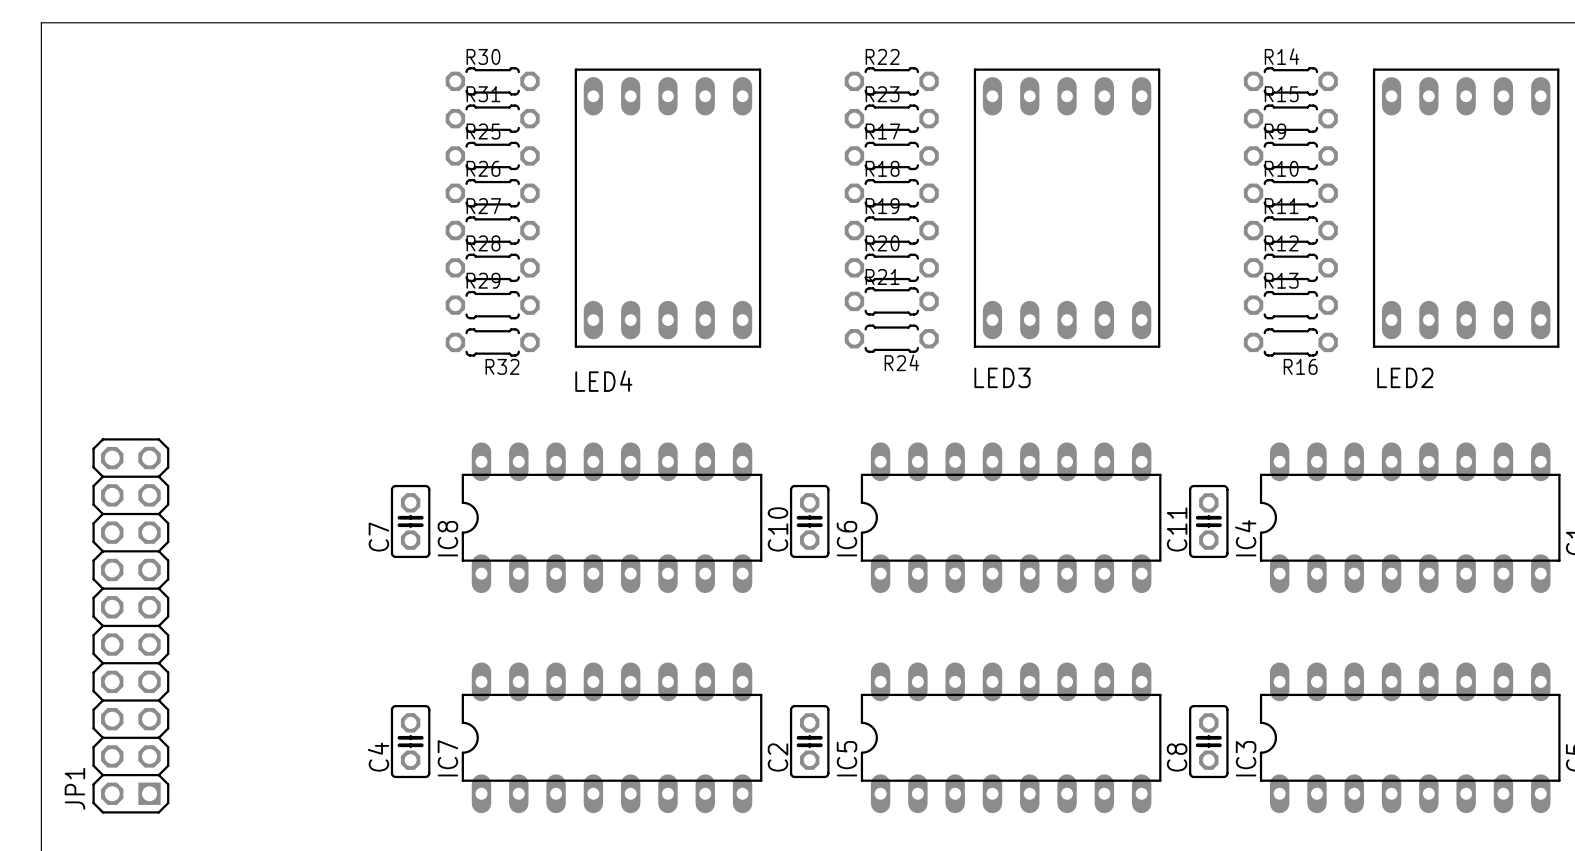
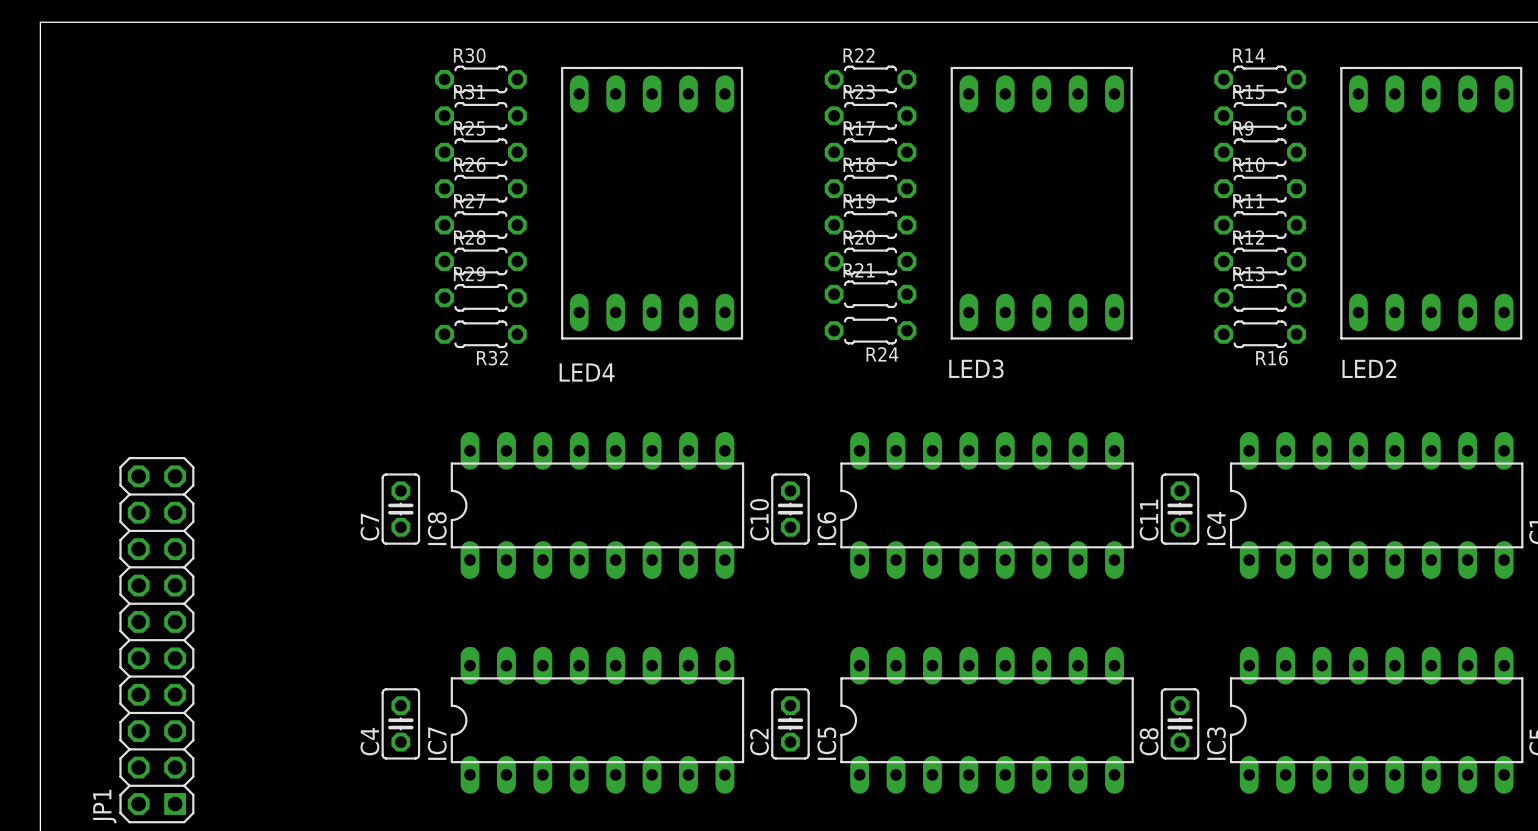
JP1 position: (130, 625) -> (156, 640)

